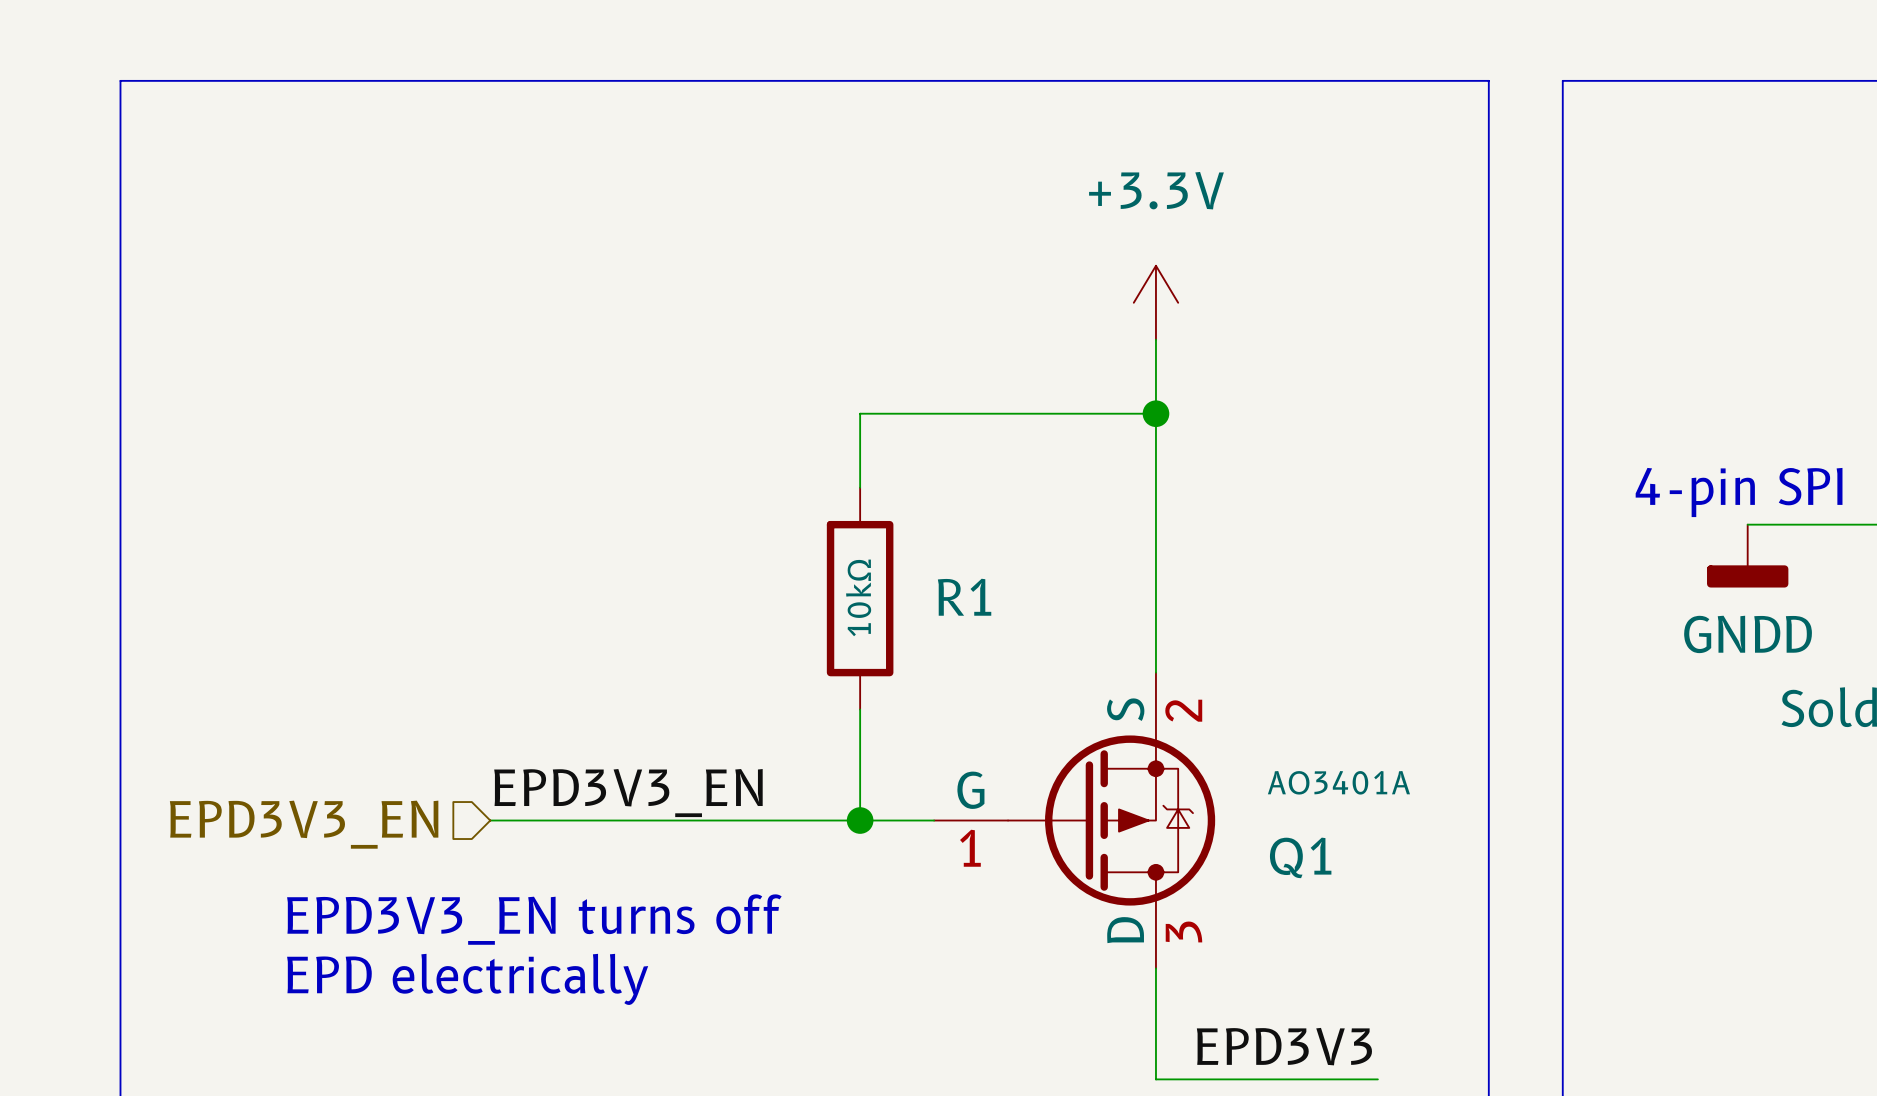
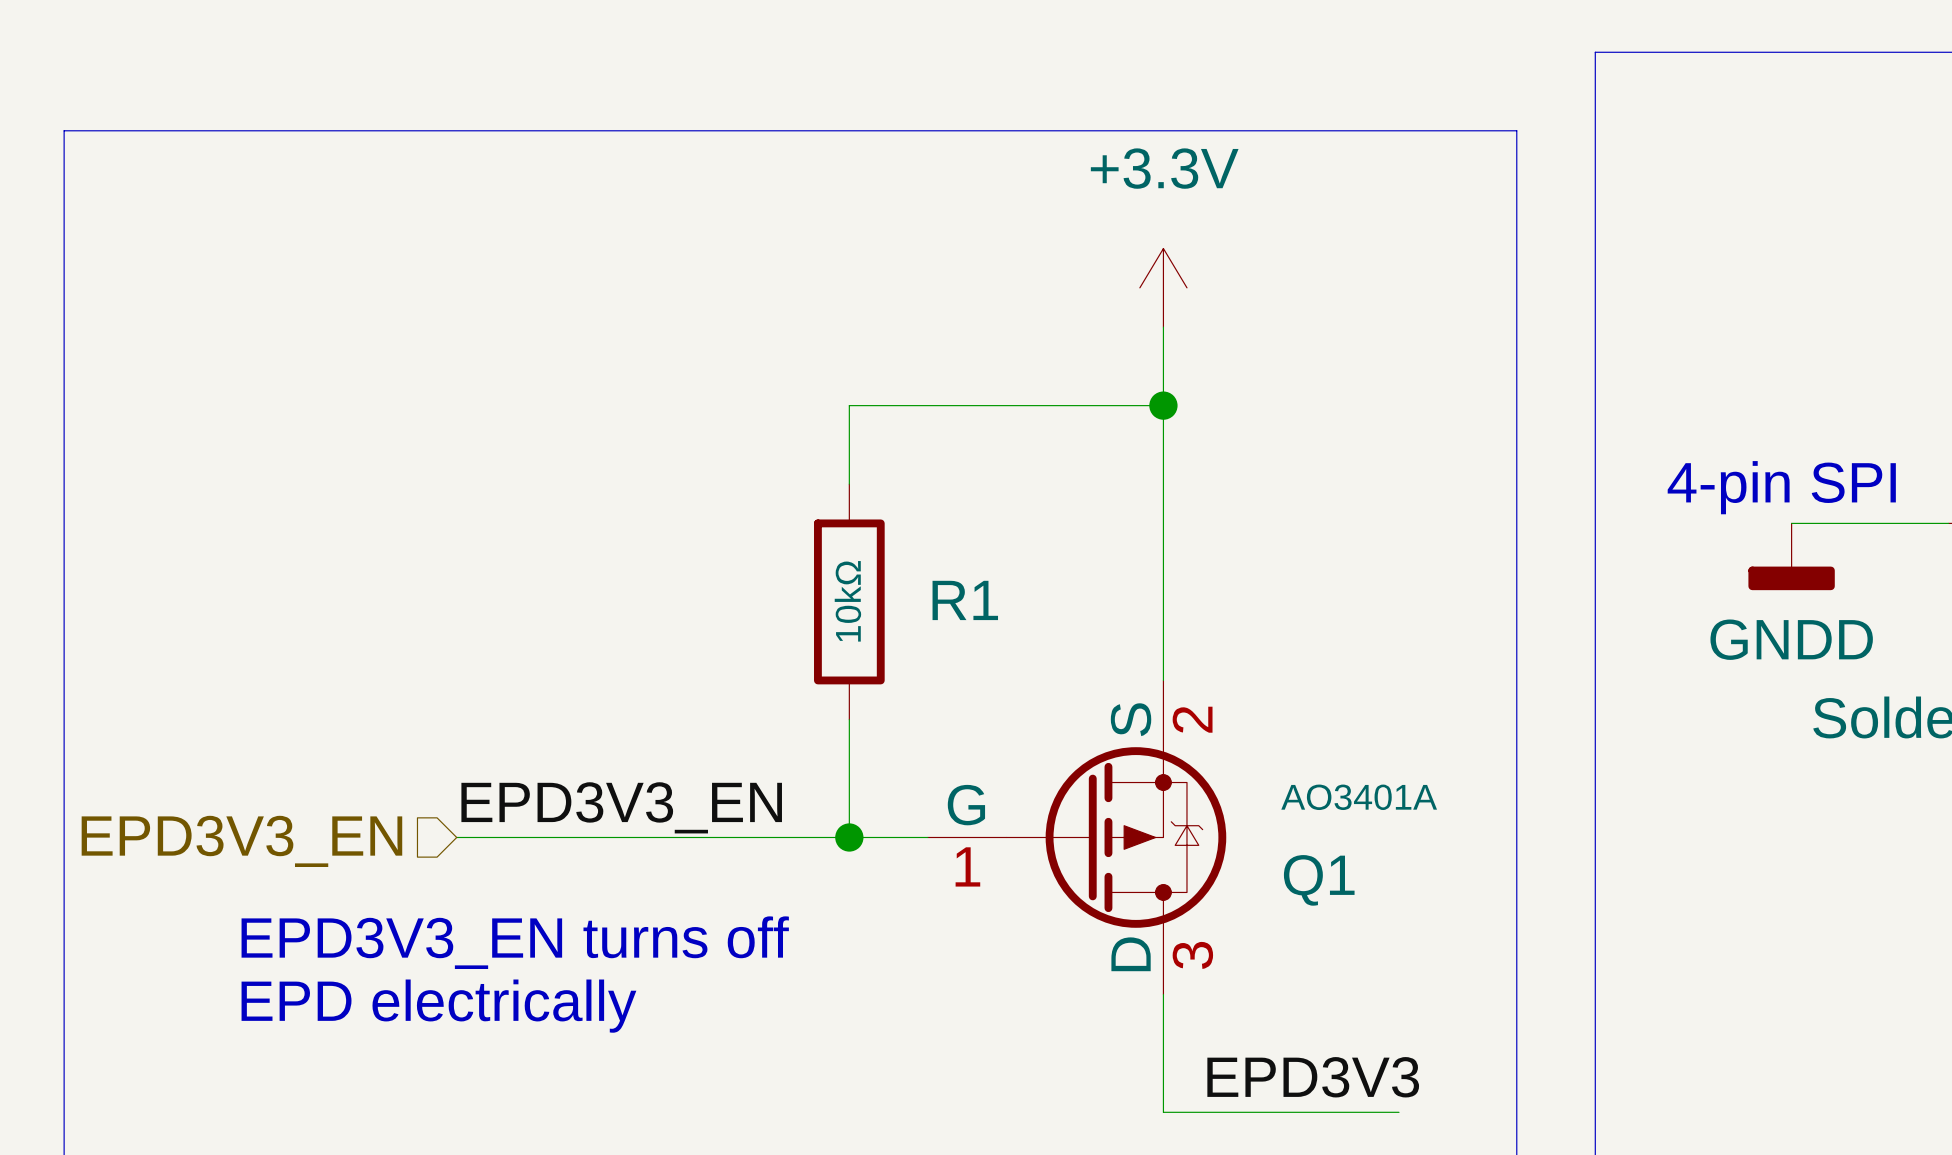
line: (120, 154) (120, 80) (1488, 80) (1488, 154) -> (64, 130) (1516, 130)

